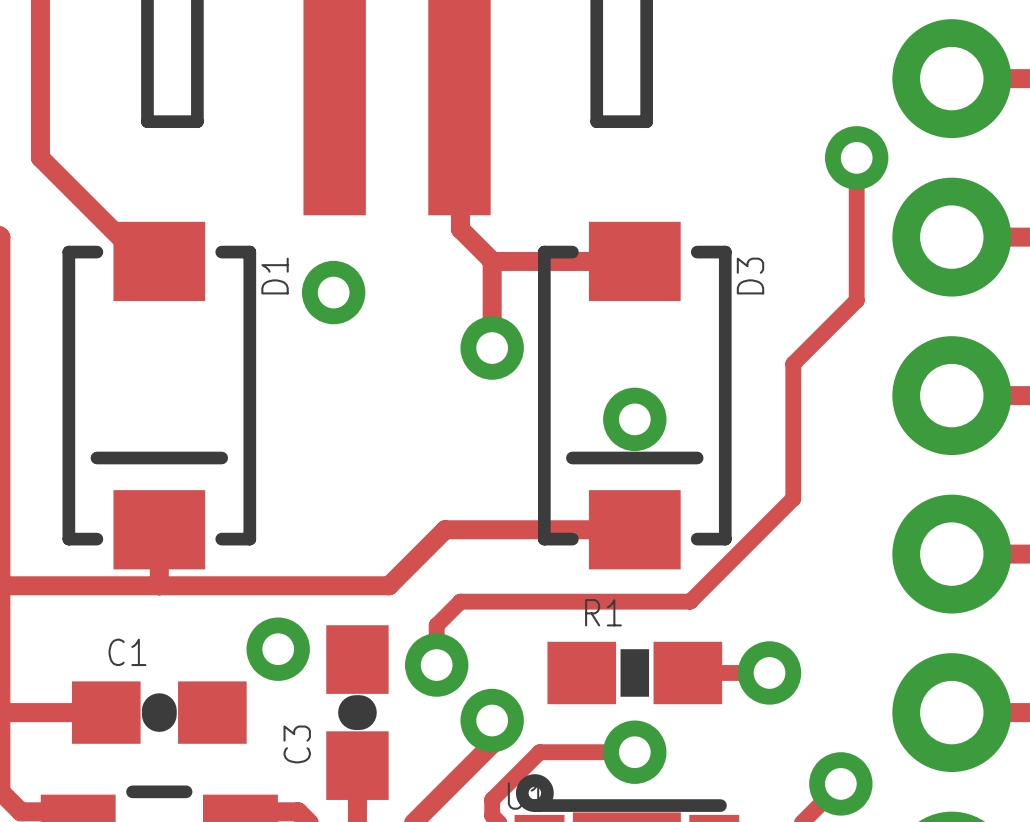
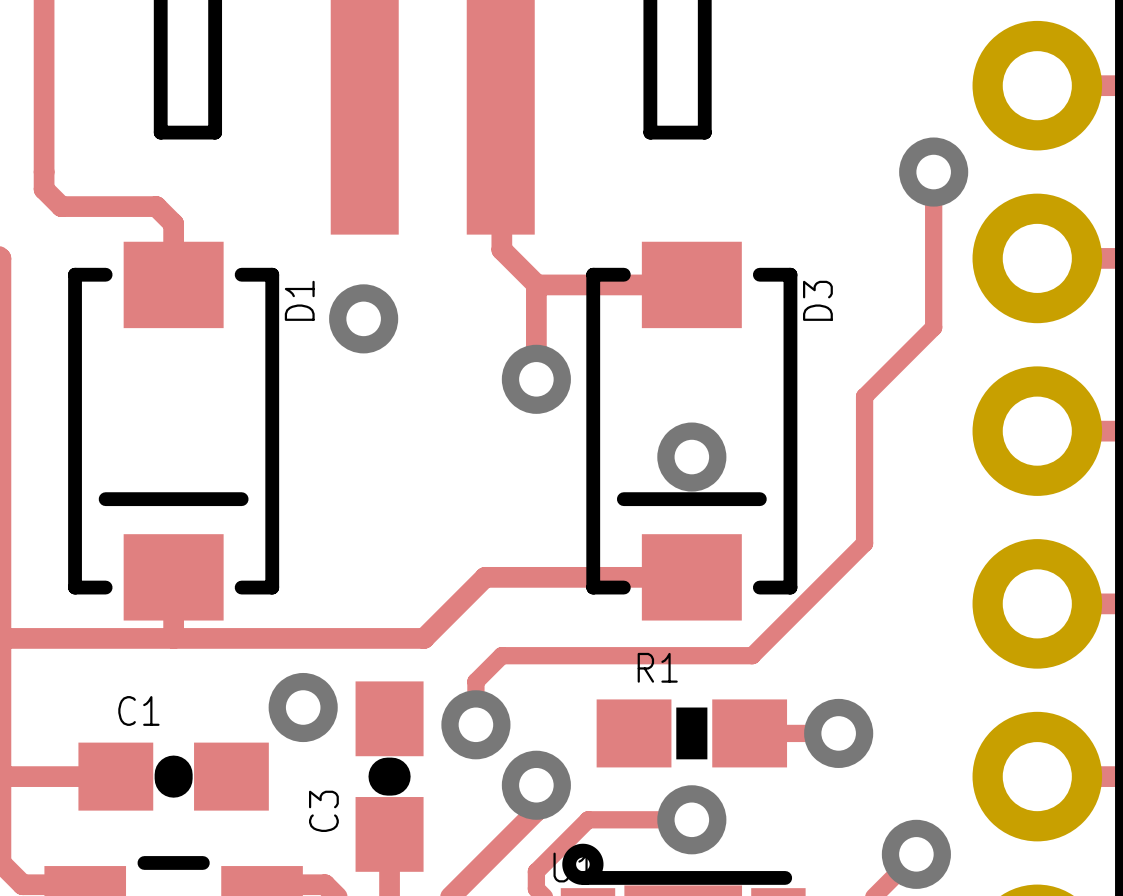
track: (40, 157) (144, 261) -> (44, 172) (44, 189) (61, 206) (156, 206) (173, 223) (173, 284)

